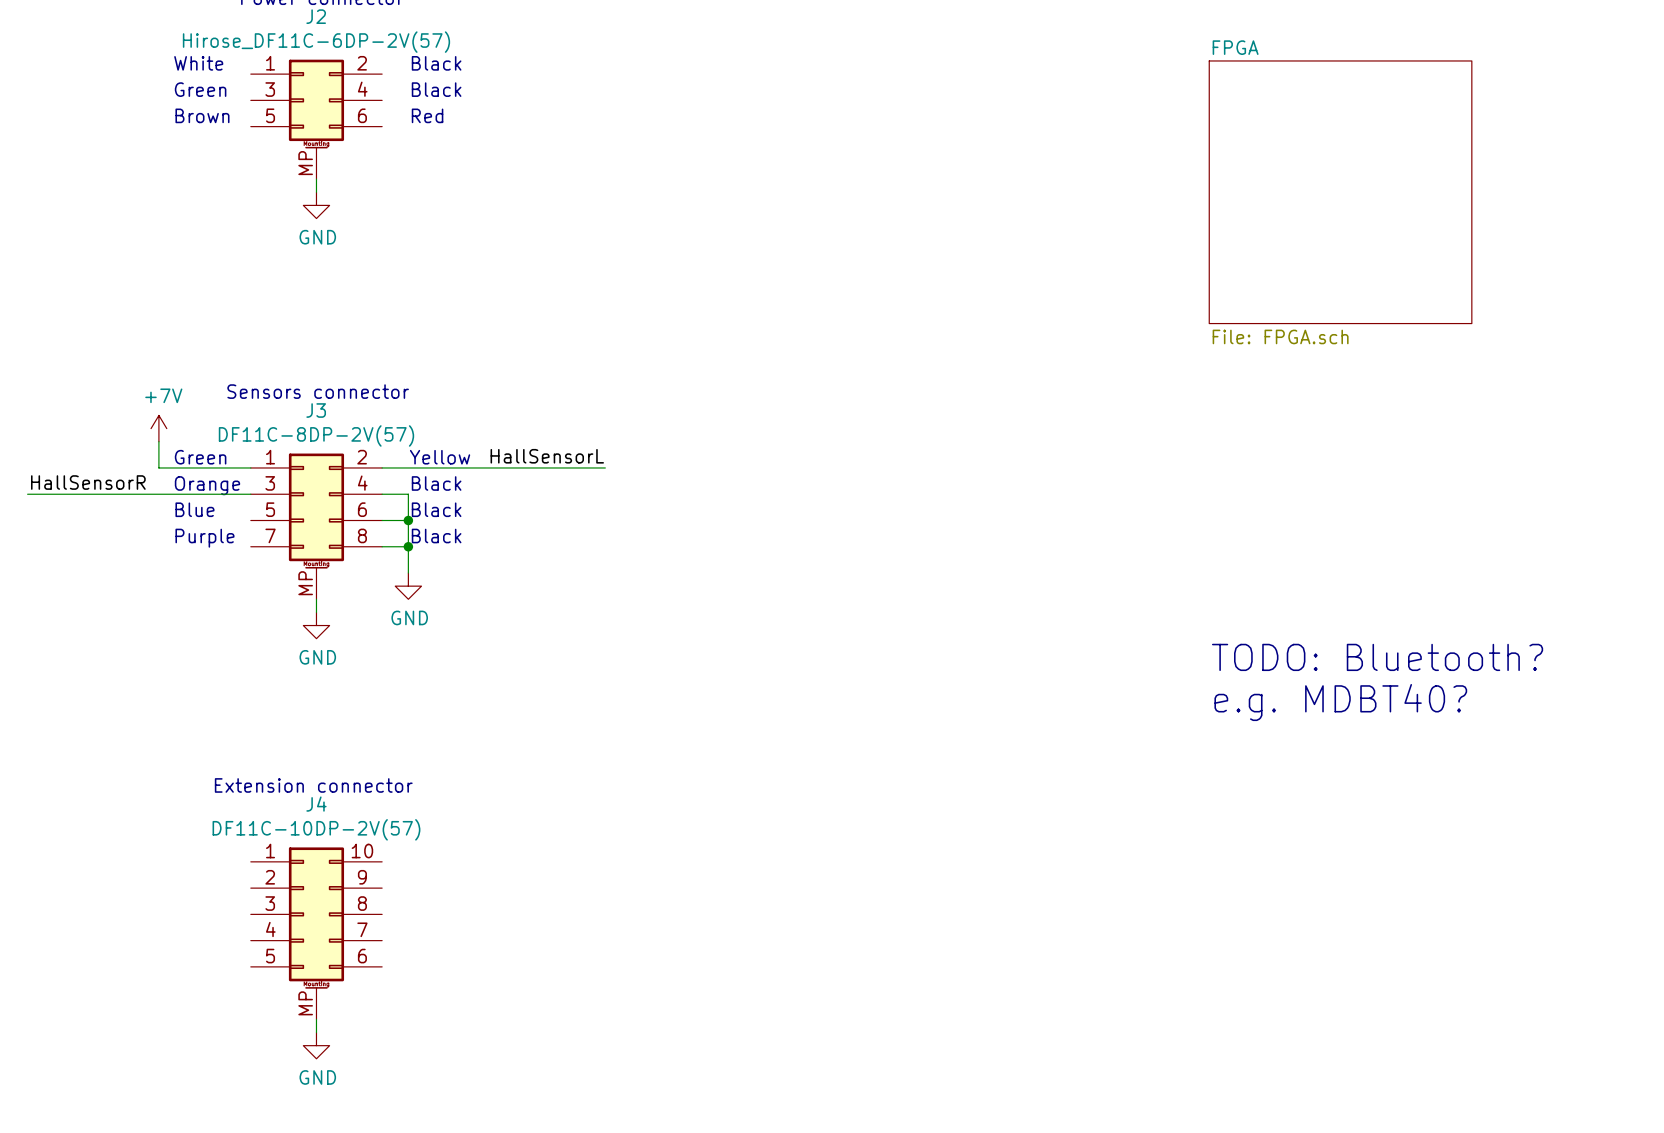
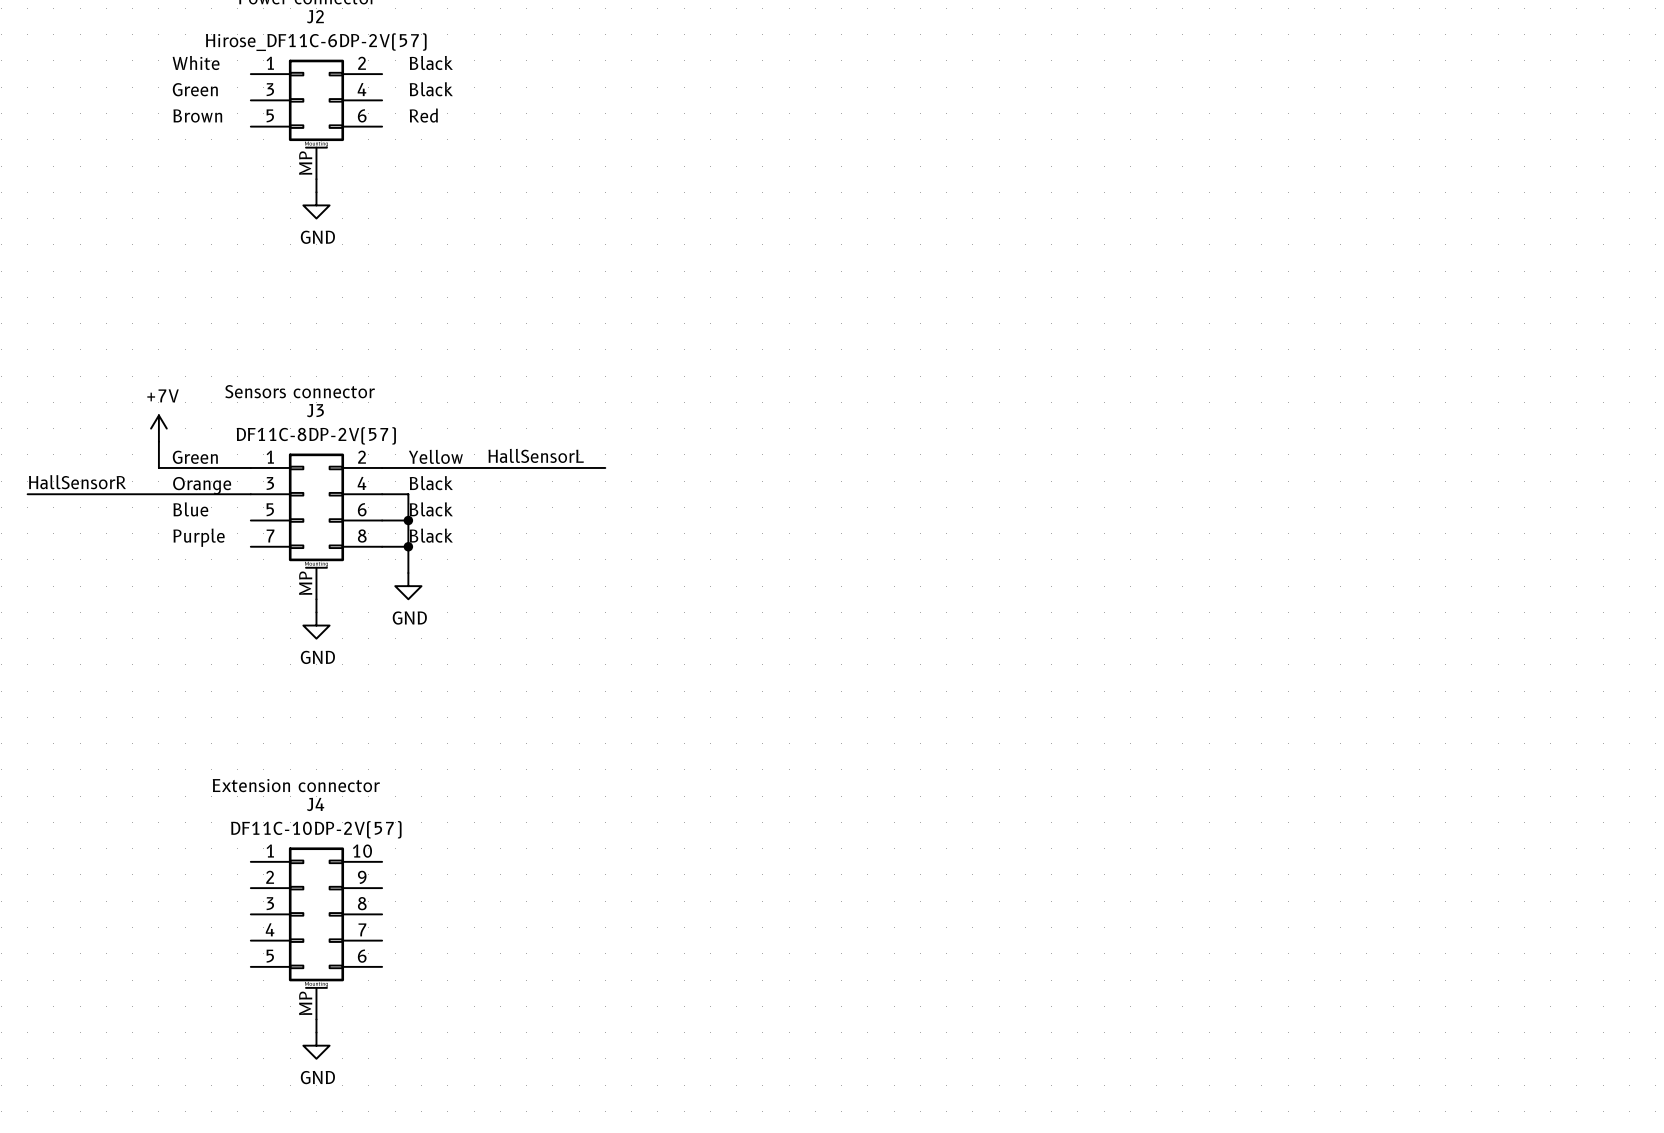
sheet FPGA: File: FPGA.sch (1340, 192) -> none
text: TODO: Bluetooth? (1377, 657) -> none
text: e.g. MDBT40? (1340, 702) -> none

